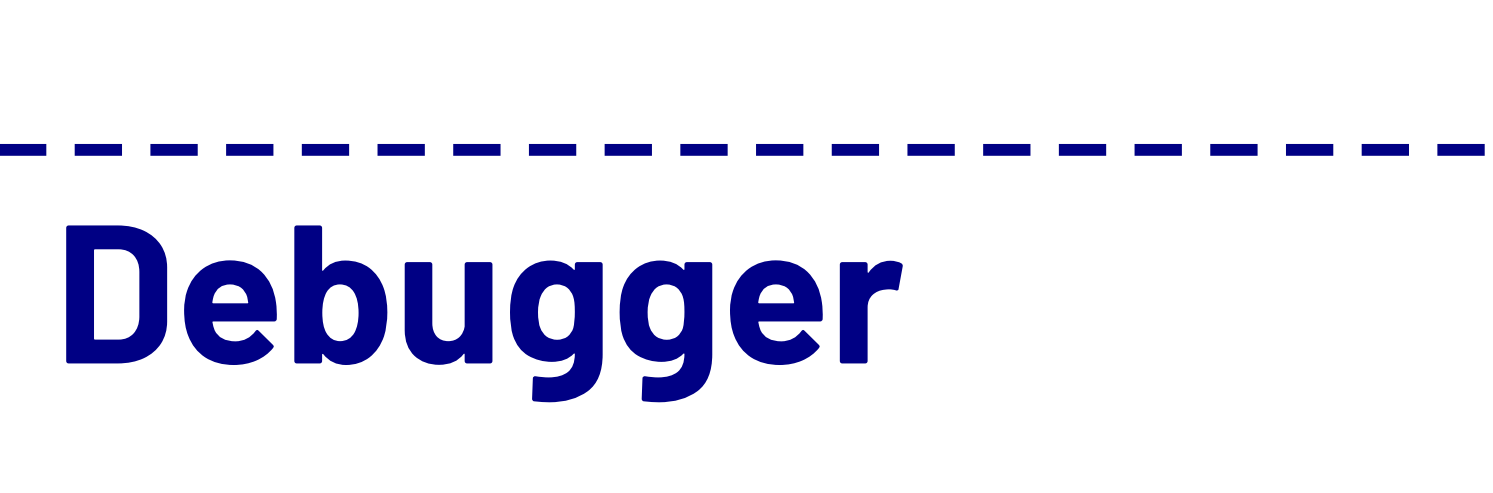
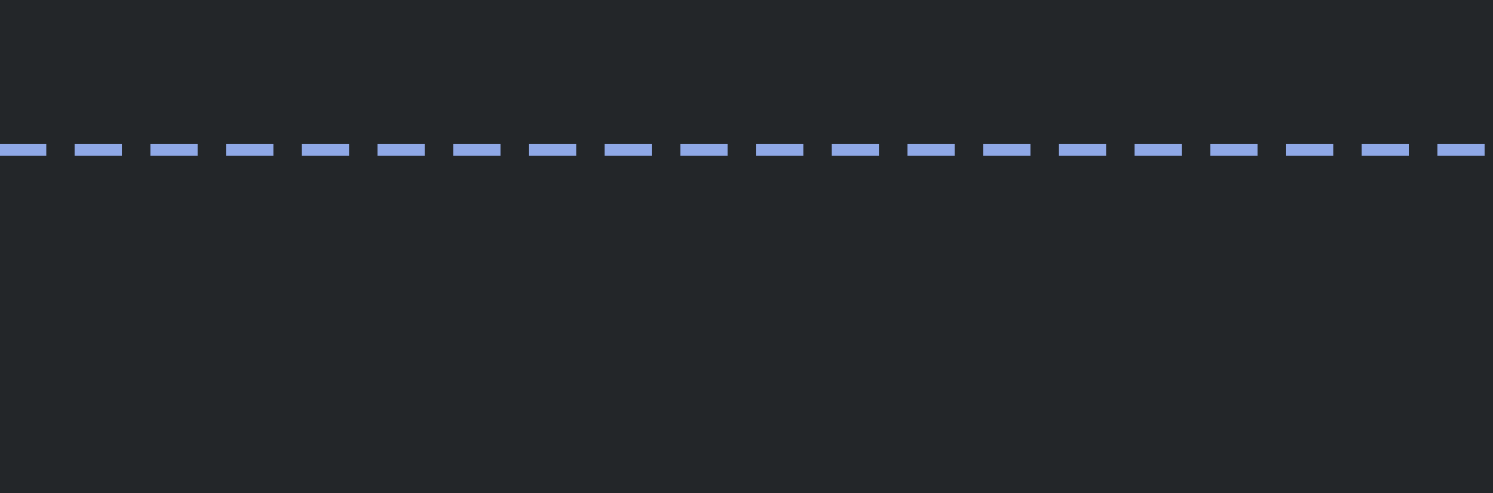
text: Debugger (484, 313) -> none

